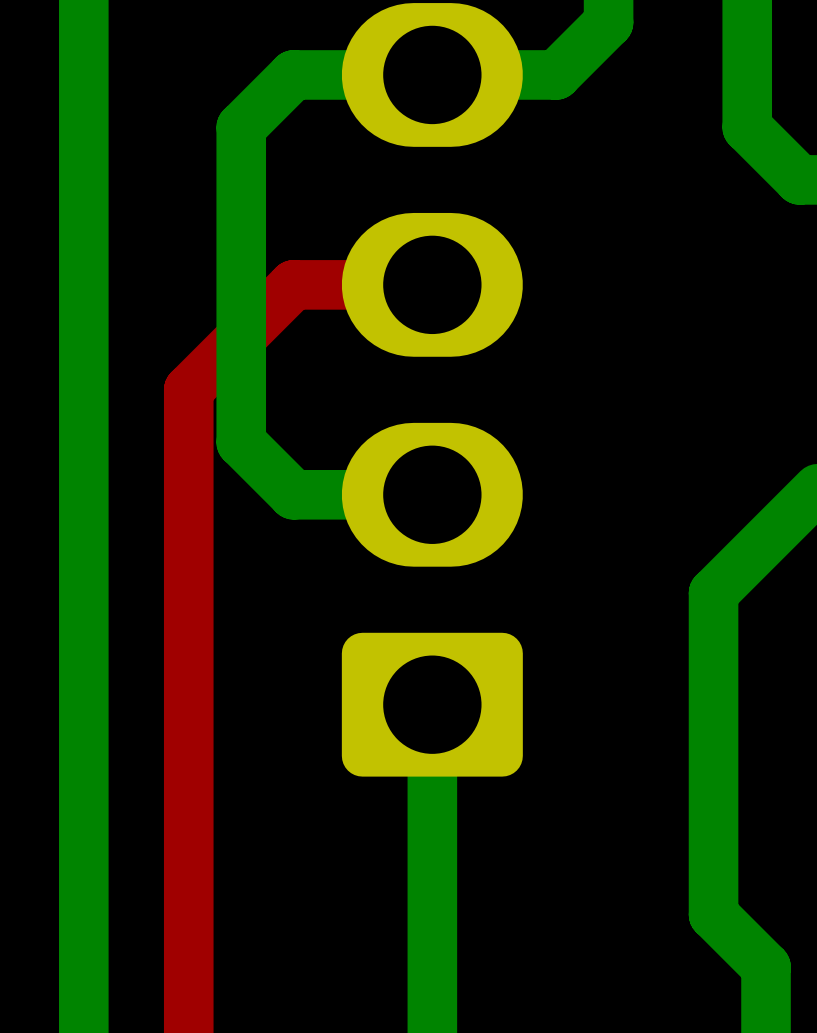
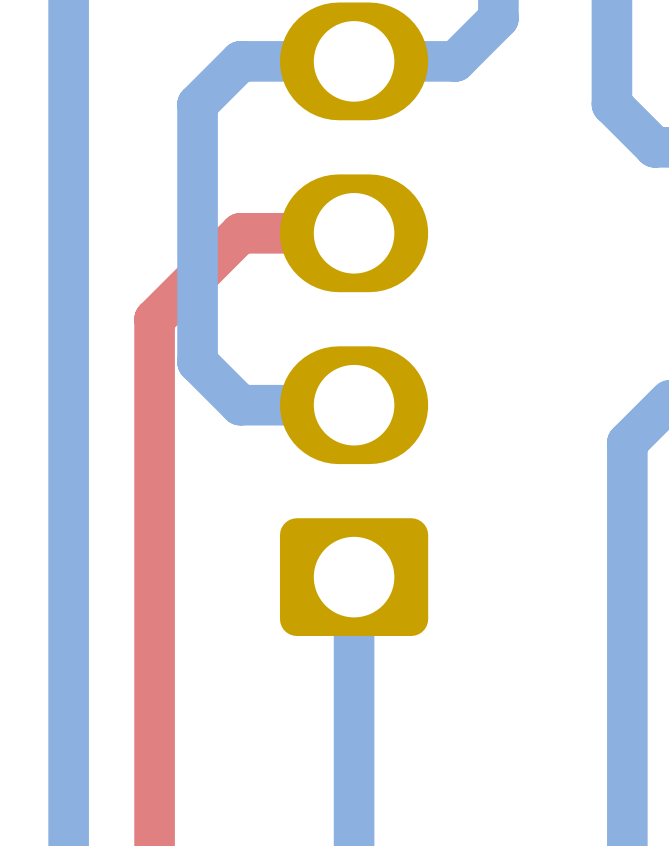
bottom track: (766, 540) (713, 593) (713, 914) (766, 967) -> (627, 442) (627, 792)

